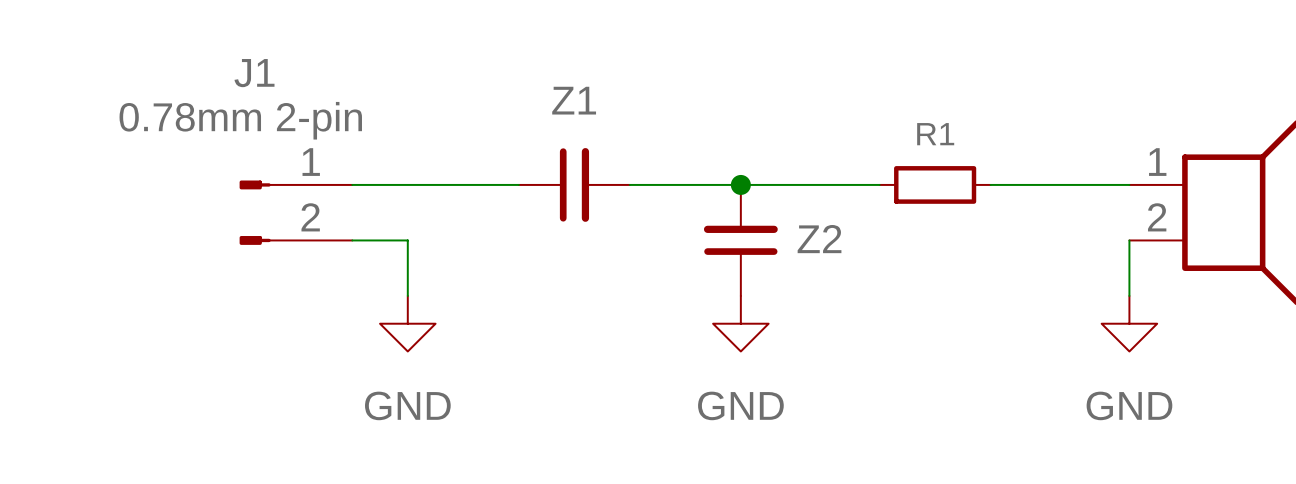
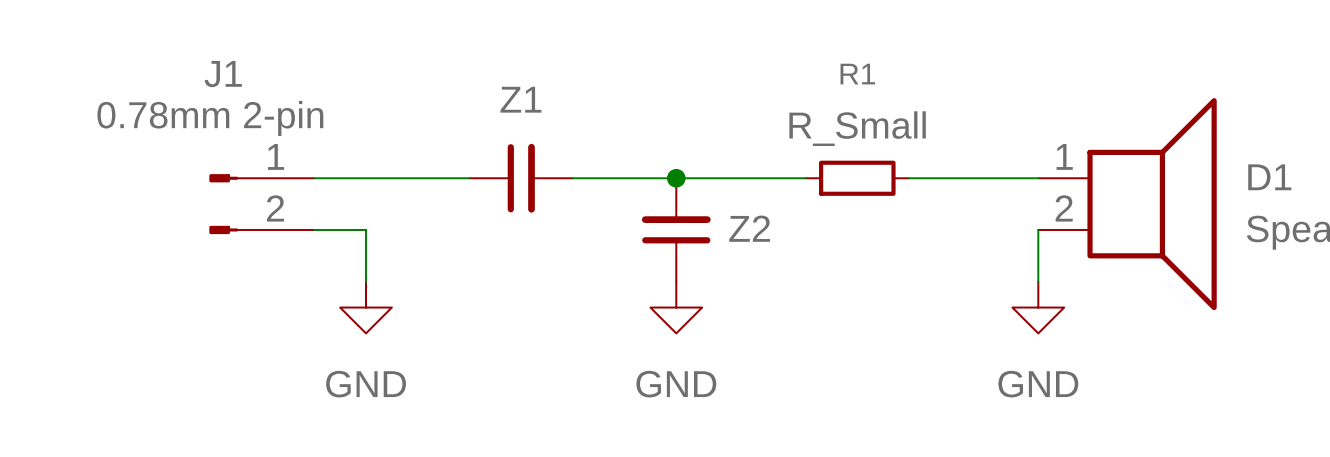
R1 value: none -> R_Small (857, 128)
R1 name position: R1 (935, 134) -> R1 (857, 74)

